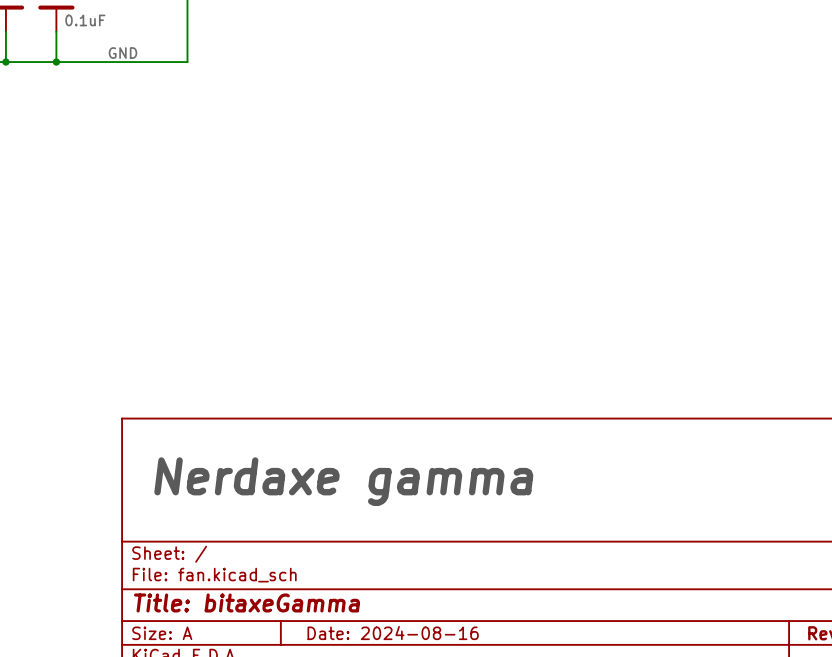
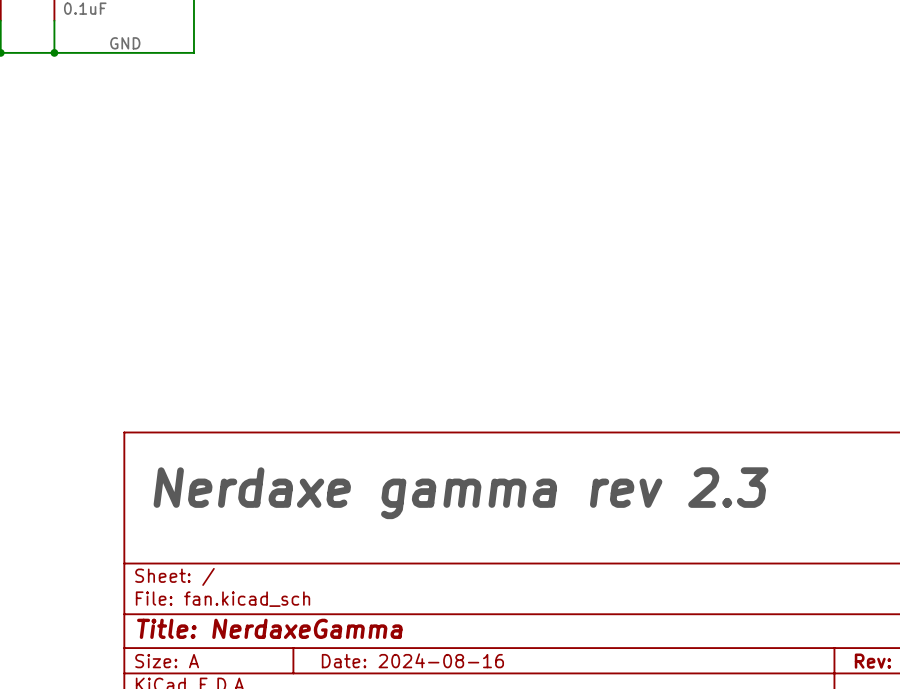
text: Nerdaxe gamma (343, 481) -> Nerdaxe gamma rev 2.3 (461, 493)
title block: Title: bitaxeGamma (247, 602) -> Title: NerdaxeGamma (269, 628)

